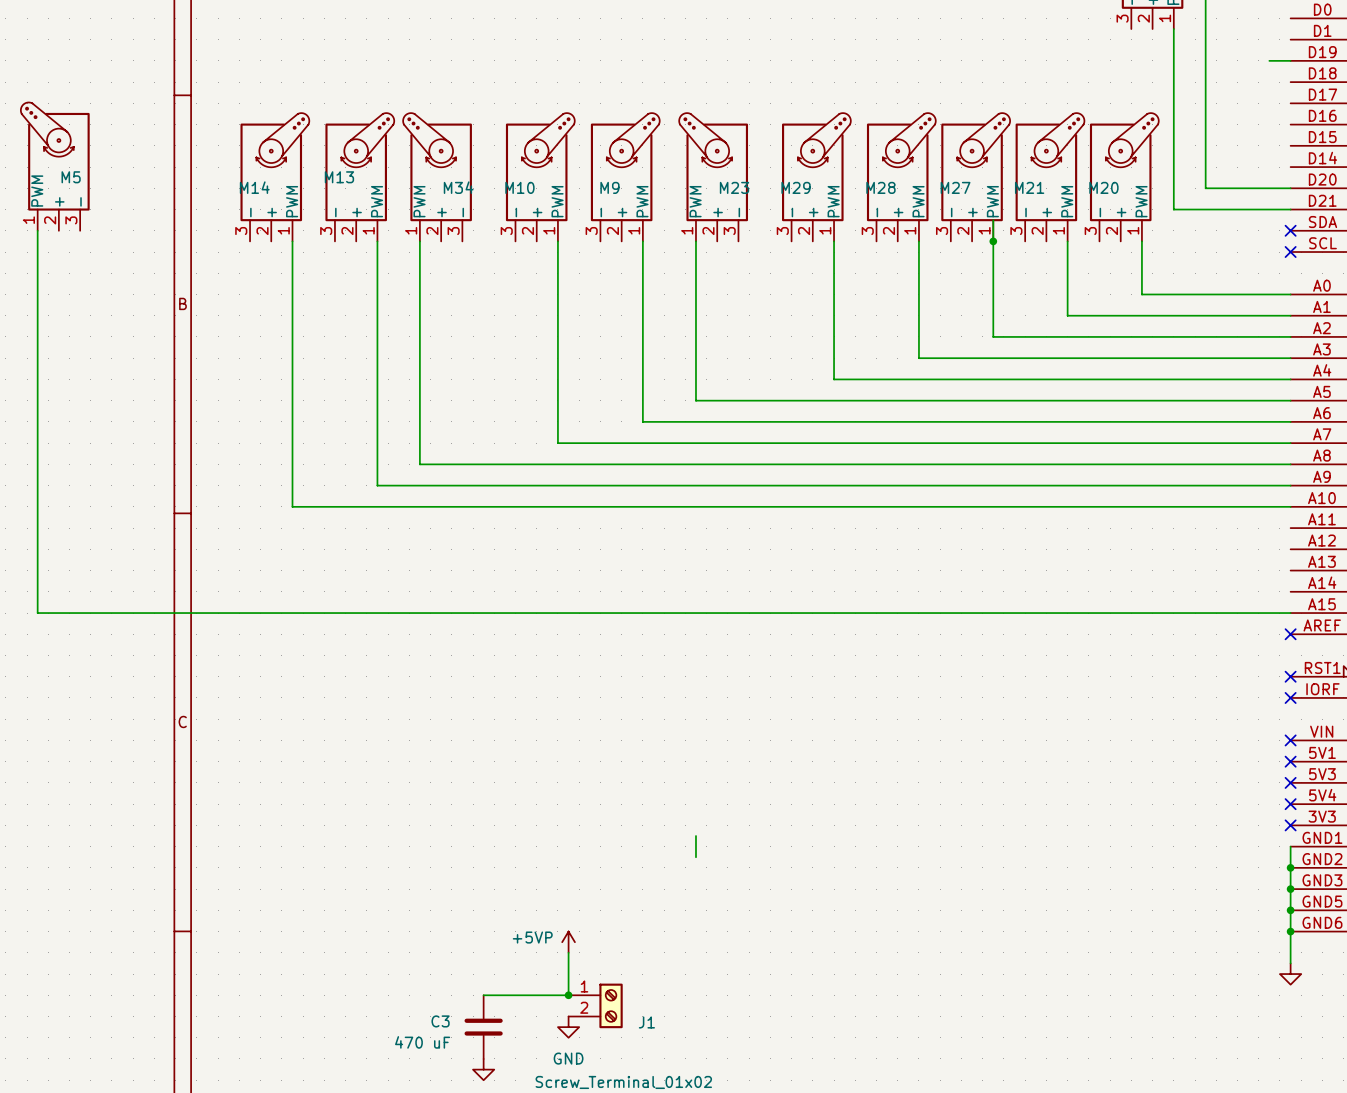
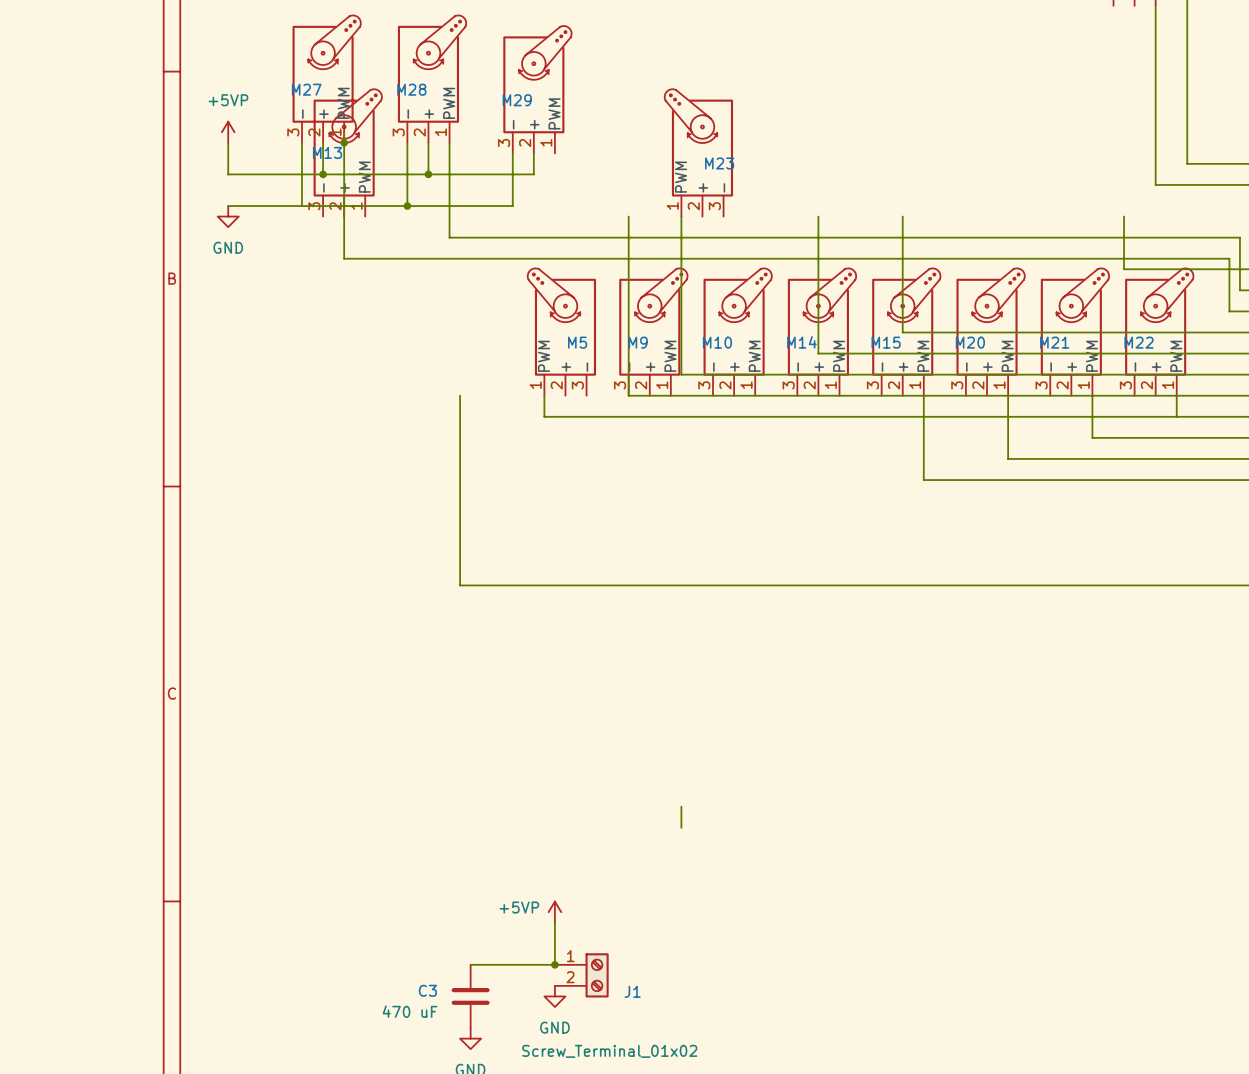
power symbol: none -> +5VP (228, 132)
M5 position: (55, 166) -> (561, 332)
wire: none -> (228, 142) (228, 174) (533, 174) (533, 153)
wire: none -> (301, 142) (301, 206)
wire: none -> (323, 142) (323, 174)
junction: none -> (344, 142)
wire: none -> (407, 142) (407, 206)
wire: none -> (428, 142) (428, 174)
M14 position: (274, 177) -> (822, 332)
M34: (437, 177) -> none
wire: none -> (512, 153) (512, 206) (228, 206)
M10 position: (540, 177) -> (737, 332)
M9 position: (625, 177) -> (653, 332)
M29 position: (816, 177) -> (537, 89)
M28 position: (901, 177) -> (432, 79)
M27 position: (975, 177) -> (326, 79)
M21 position: (1050, 177) -> (1074, 332)
M20 position: (1124, 177) -> (990, 332)
junction: none -> (323, 174)
junction: none -> (428, 174)
wire: (993, 220) (993, 336) (1248, 336) -> (344, 132) (344, 258) (1229, 258) (1229, 311)
wire: (37, 230) (37, 613) (473, 613) -> (460, 395) (460, 585)
junction: none -> (407, 206)
power symbol: none -> GND (228, 216)
wire: (292, 241) (292, 506) (940, 506) -> (923, 395) (923, 480)
wire: (377, 241) (377, 485) (1025, 485) -> (1008, 395) (1008, 458)
wire: (419, 241) (419, 464) (1110, 464) -> (1092, 395) (1092, 437)
wire: (557, 241) (557, 421) -> none
junction: (993, 241) -> none
wire: (1067, 241) (1067, 315) (1258, 315) -> (449, 142) (449, 237) (1239, 237) (1239, 290)
M15: none -> (906, 332)
M22: none -> (1159, 332)
wire: none -> (1176, 395) (1176, 416)

